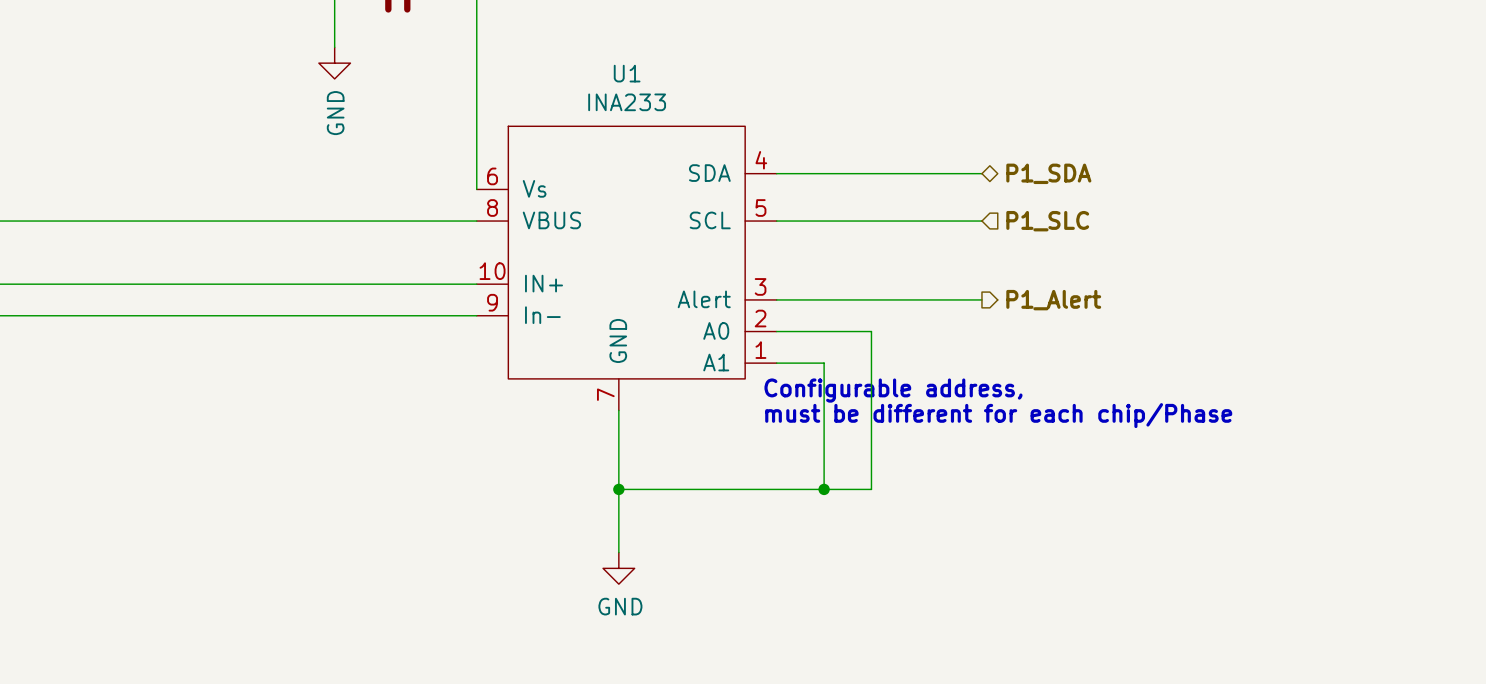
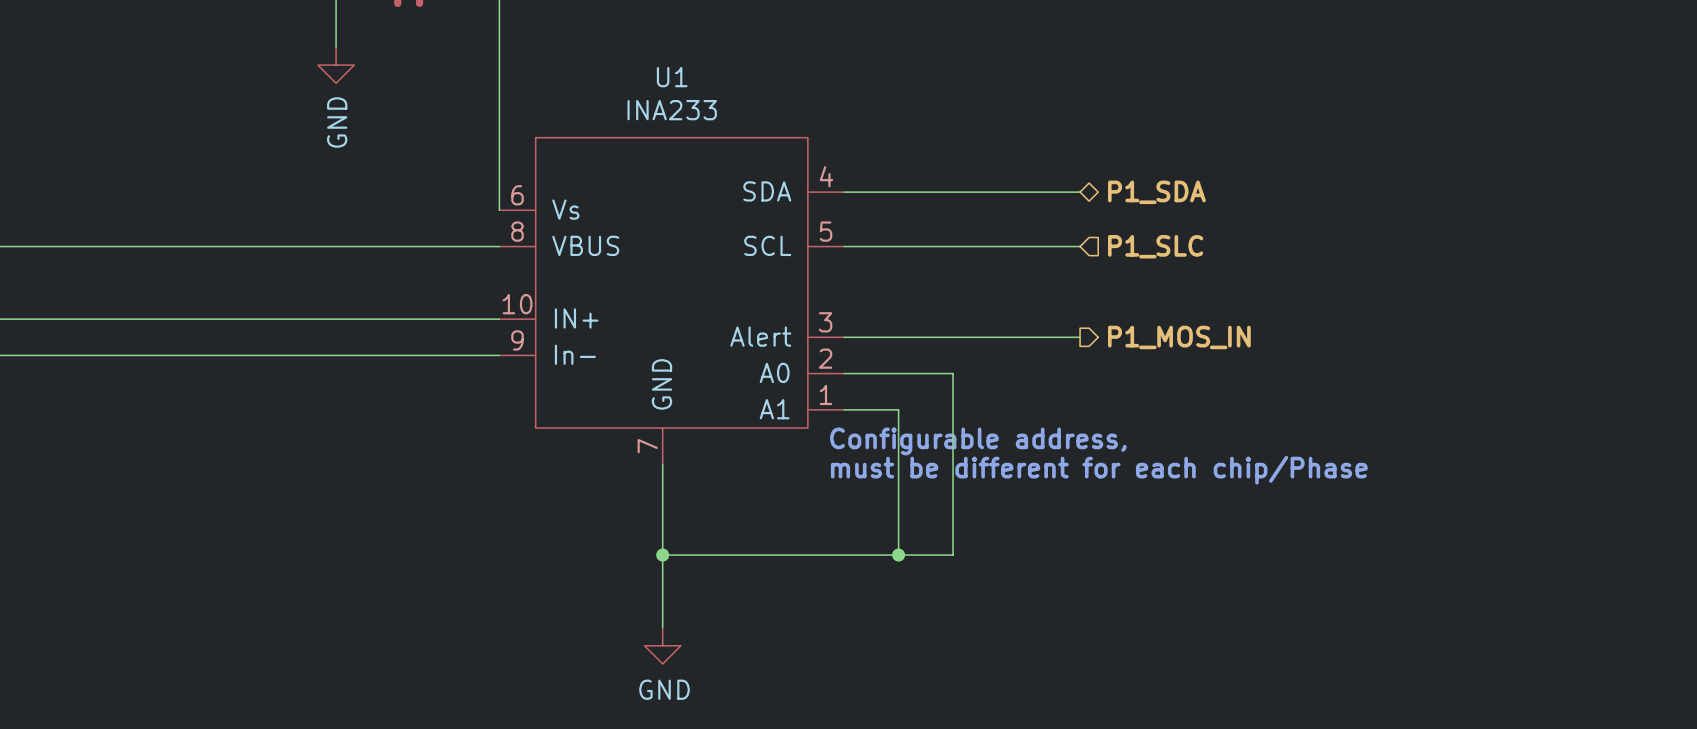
hierarchical label: P1_Alert (1053, 300) -> P1_MOS_IN (1179, 337)

